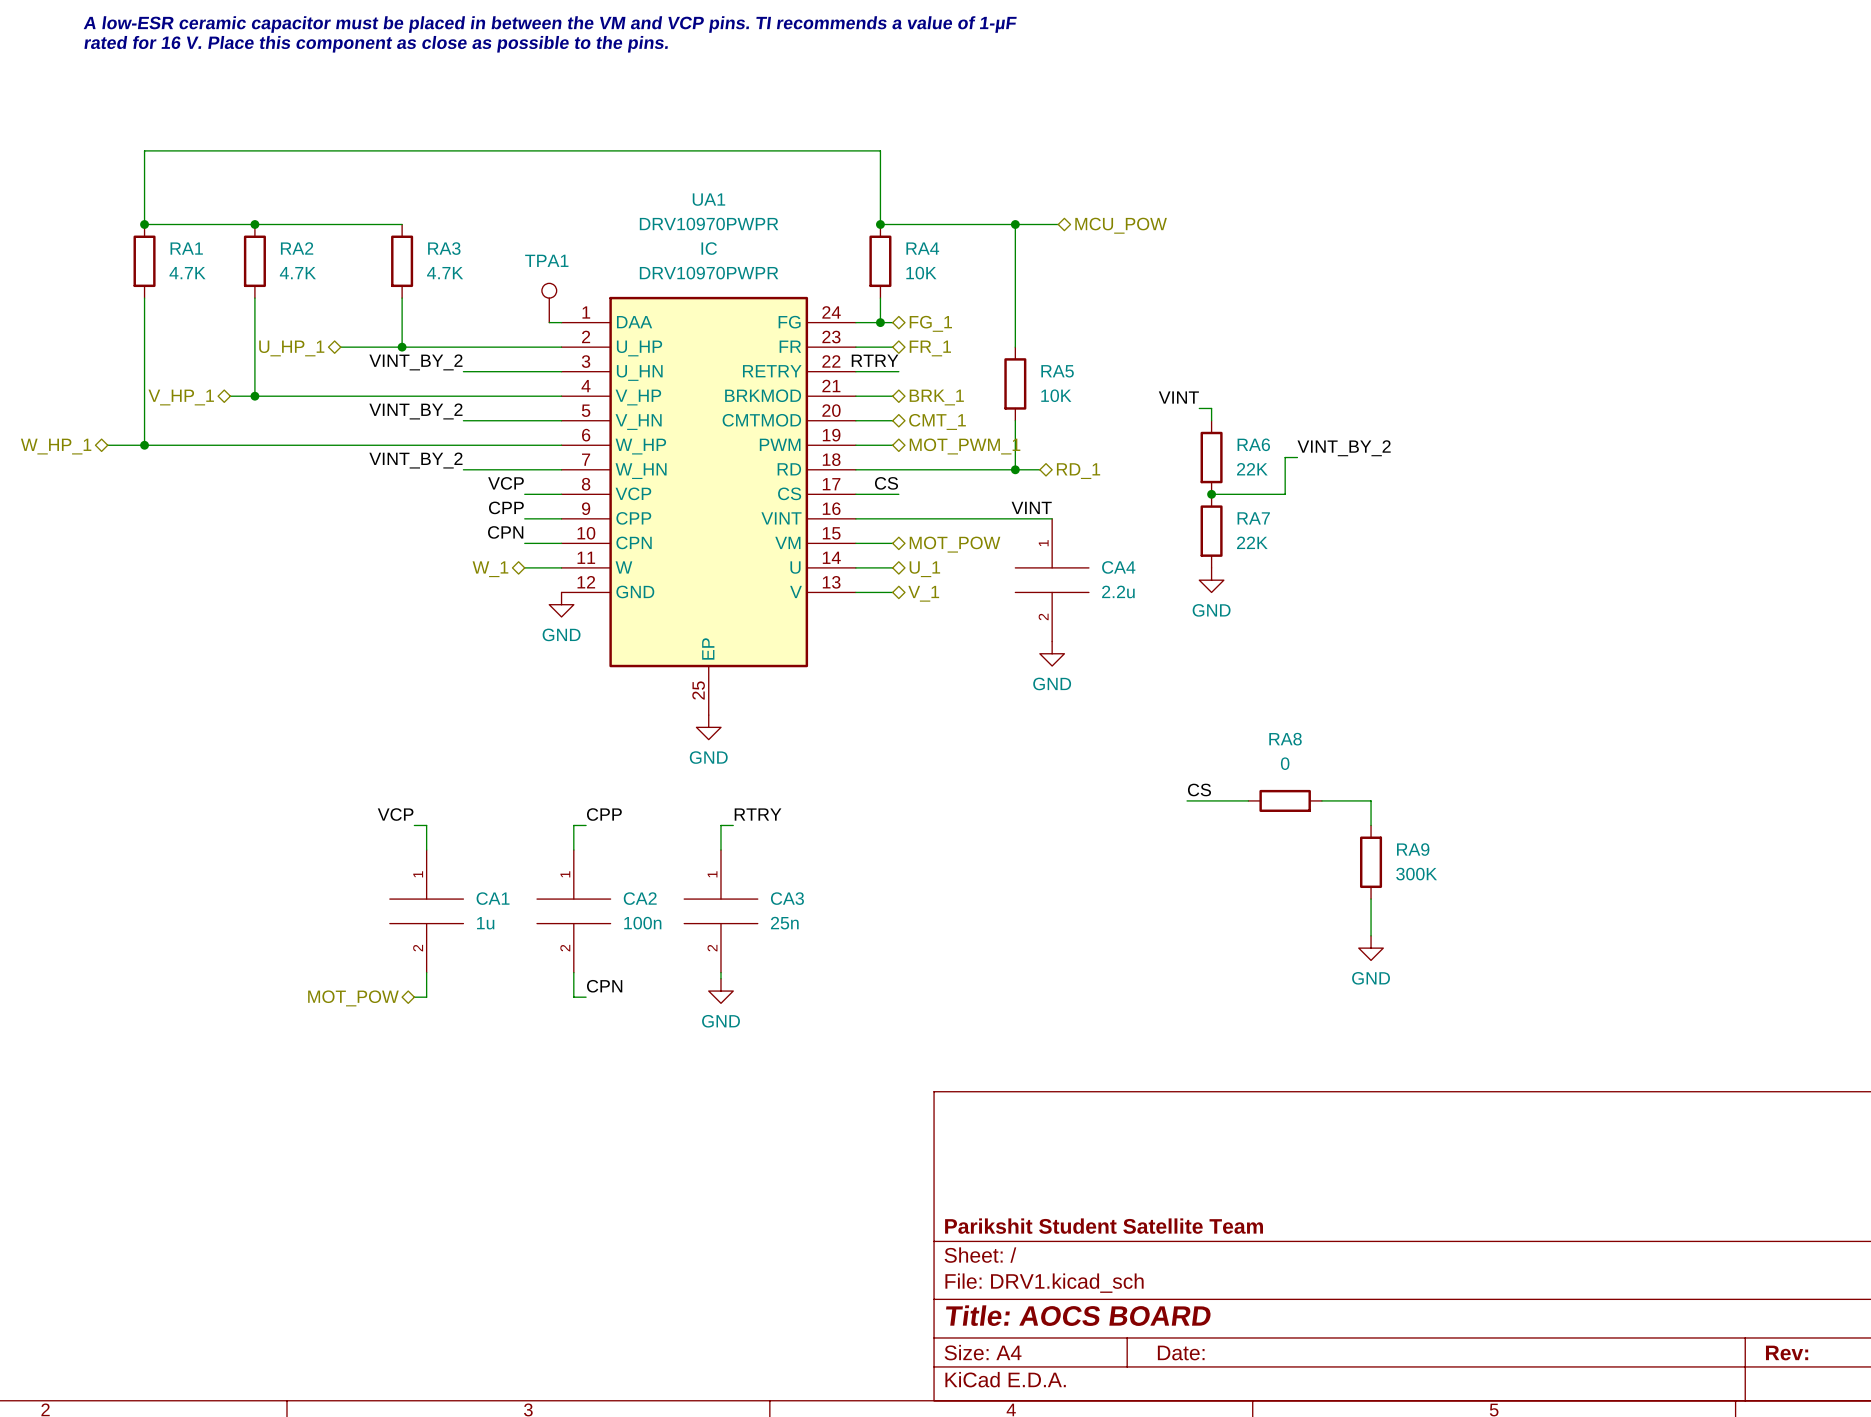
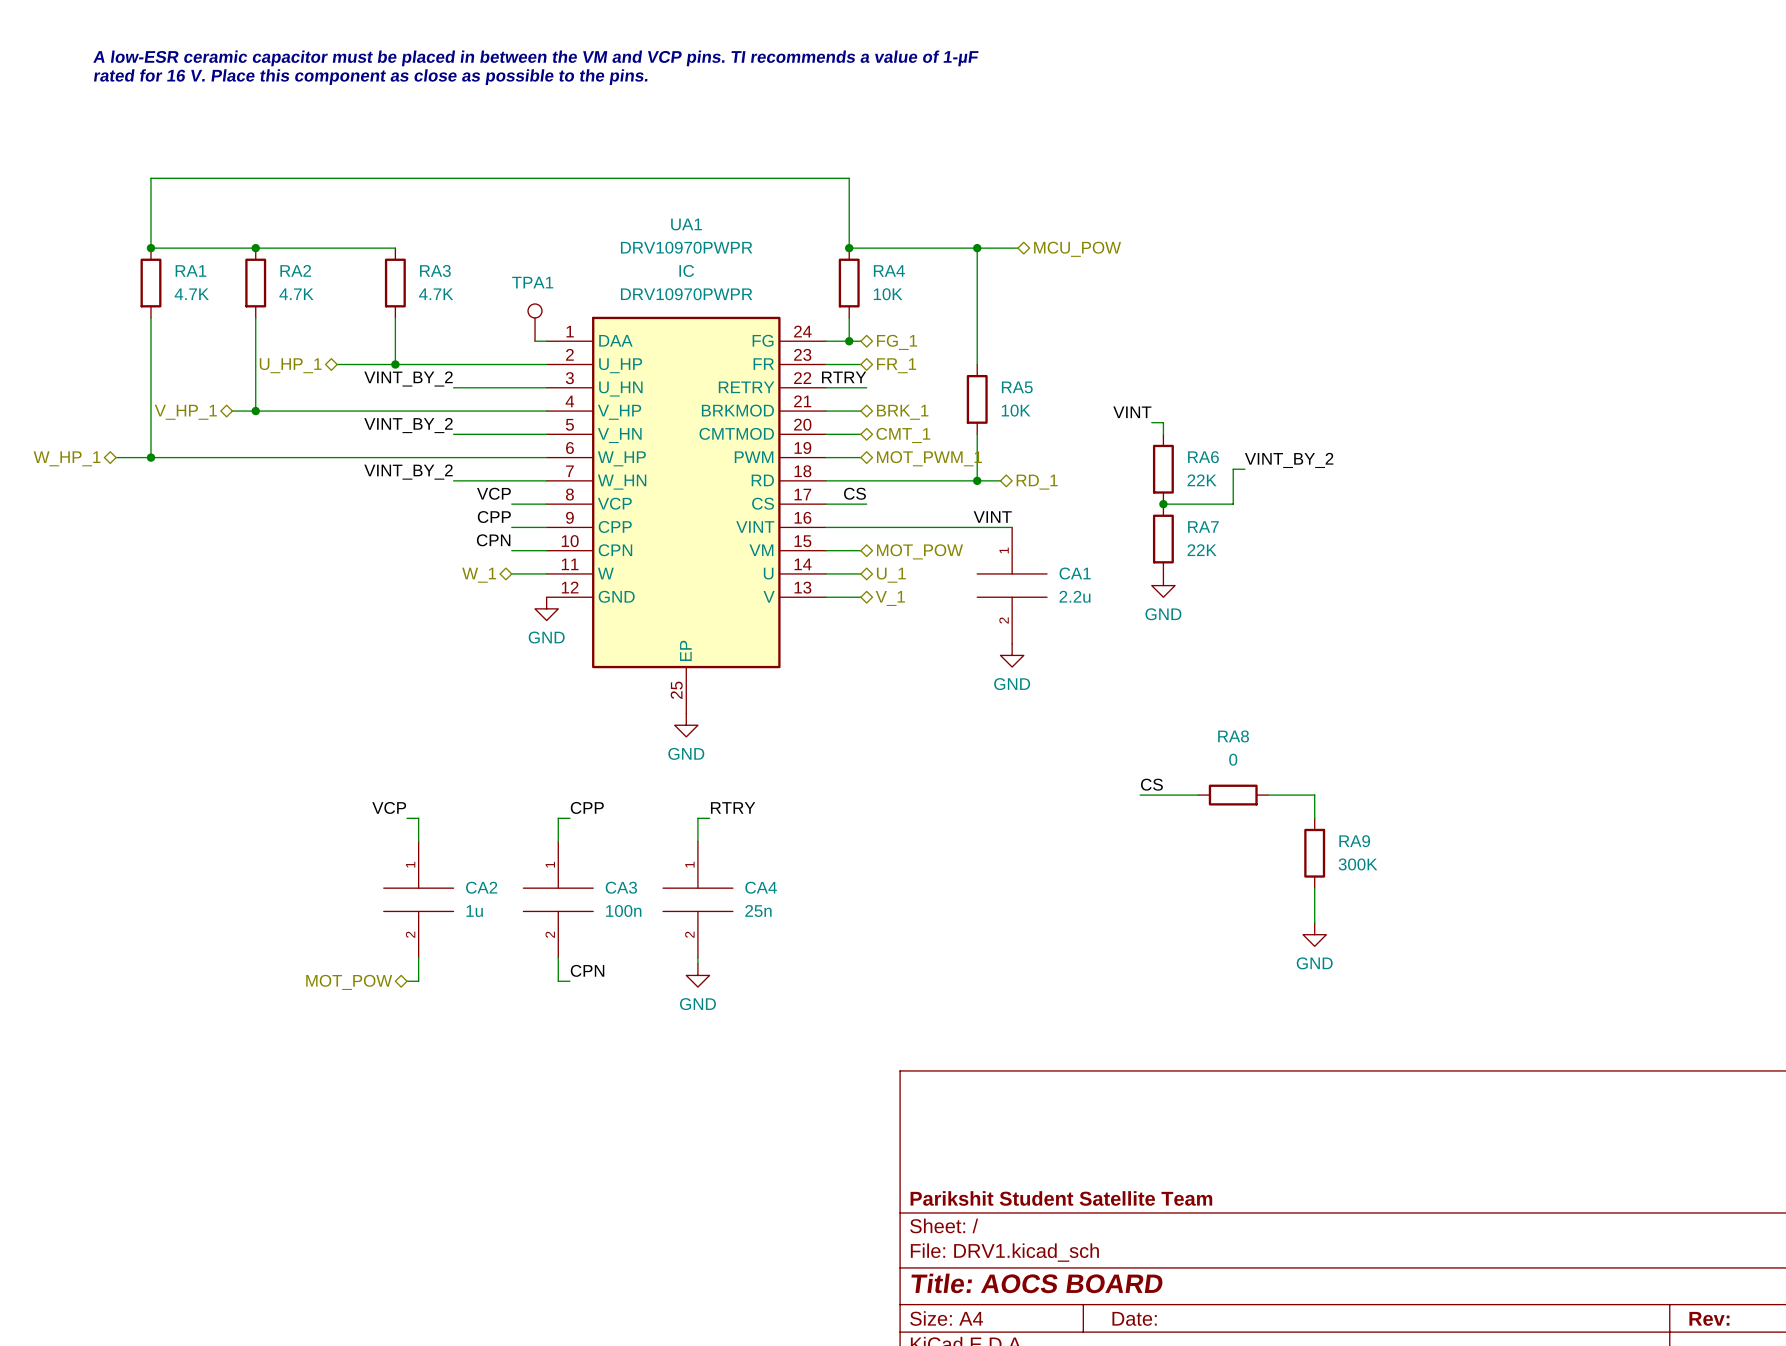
CA4 name: CA4 (1118, 567) -> CA1 (1075, 573)
CA1 name: CA1 (493, 898) -> CA2 (481, 887)
CA2 name: CA2 (640, 898) -> CA3 (621, 887)
CA3 name: CA3 (787, 898) -> CA4 (761, 887)

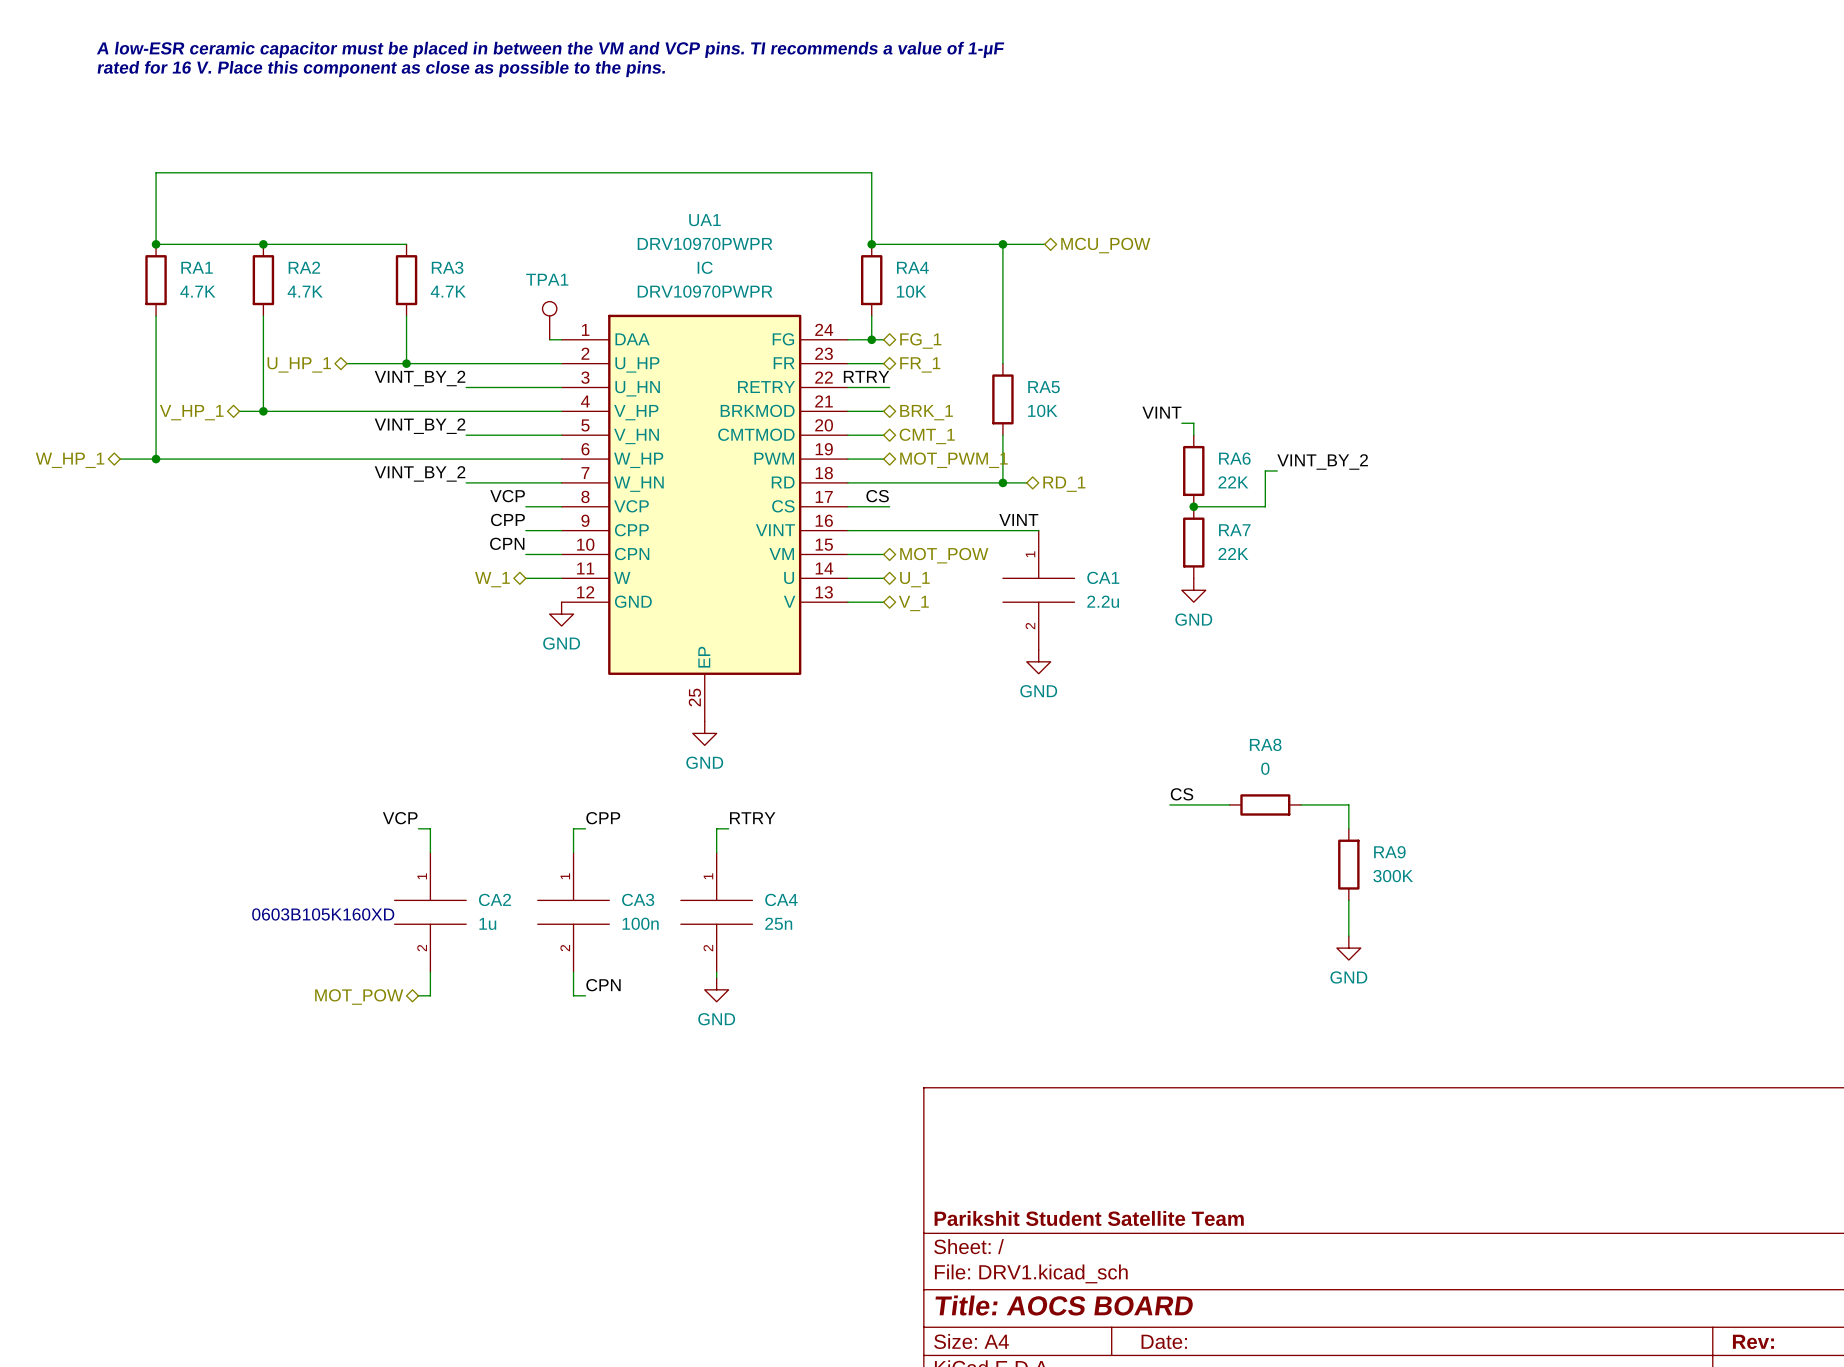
text: none -> 0603B105K160XD (323, 914)

